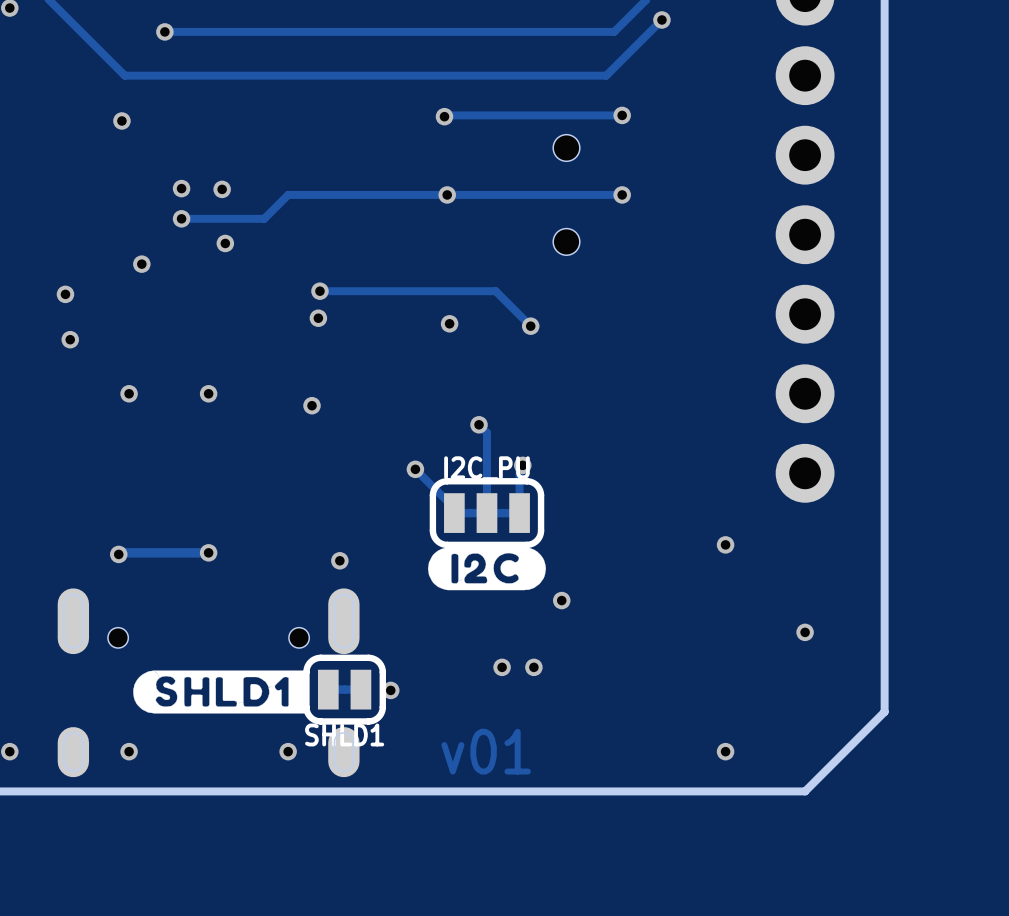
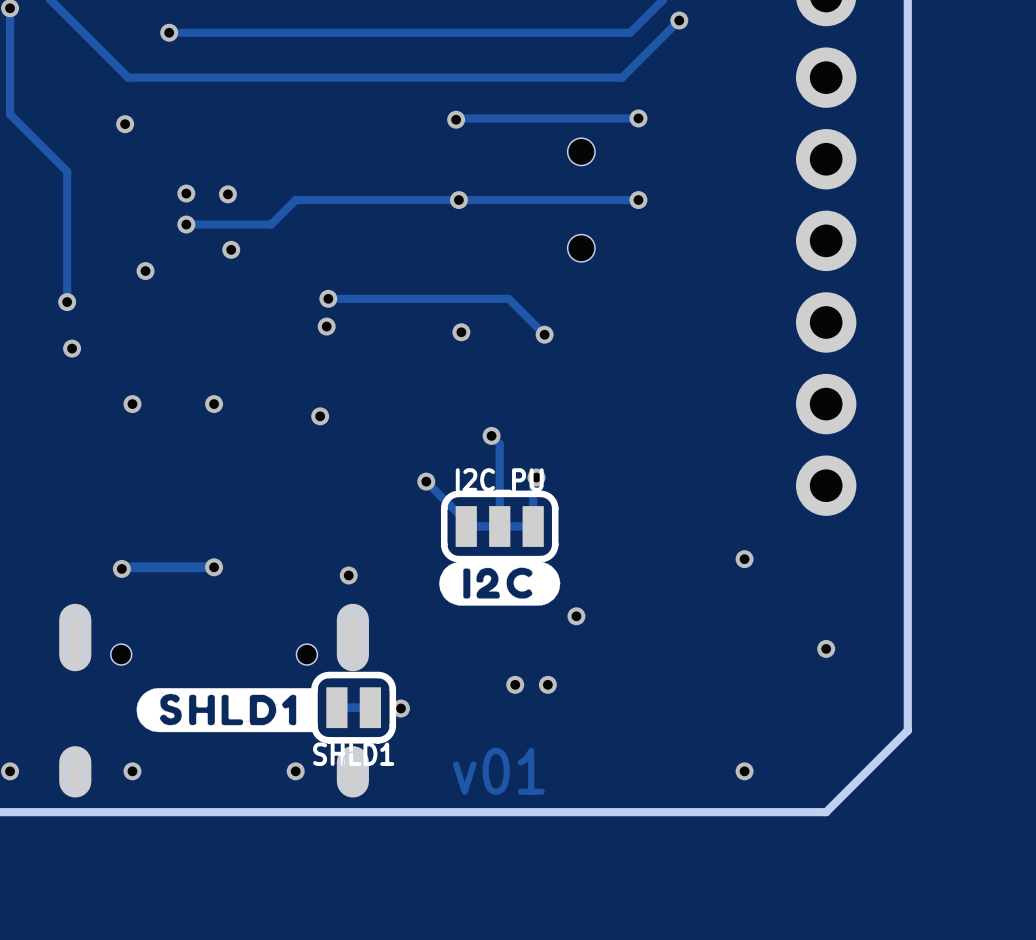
track: none -> (10, 8) (10, 114) (67, 171) (67, 302)

